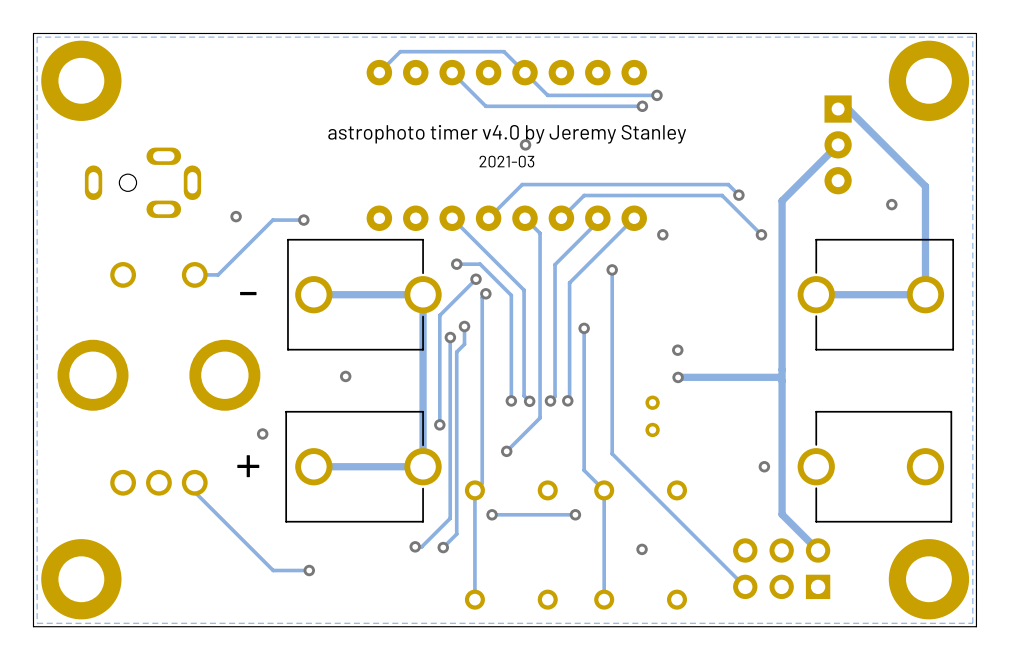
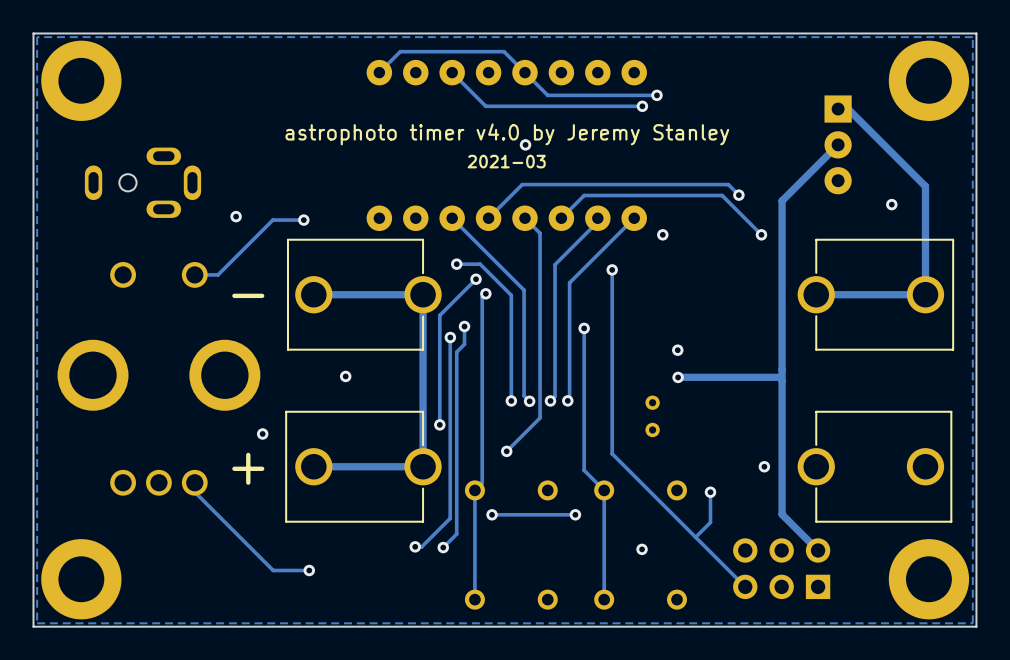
track: none -> (710, 492) (710, 522) (695, 537)
via: none -> (710, 492)

